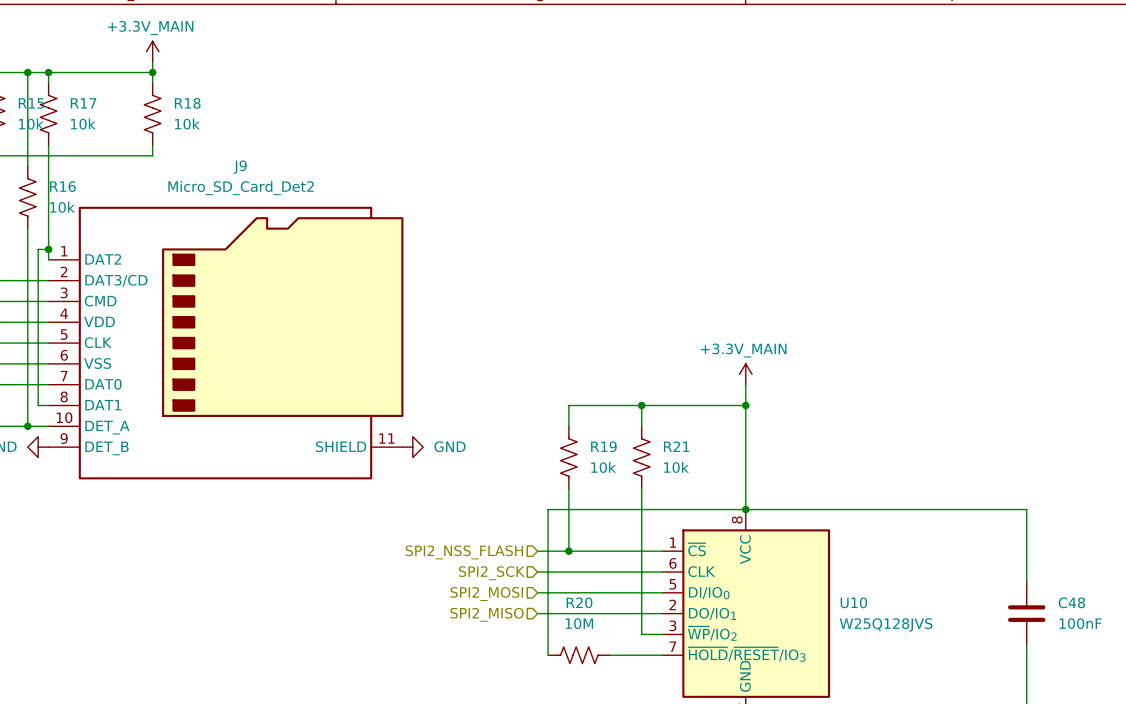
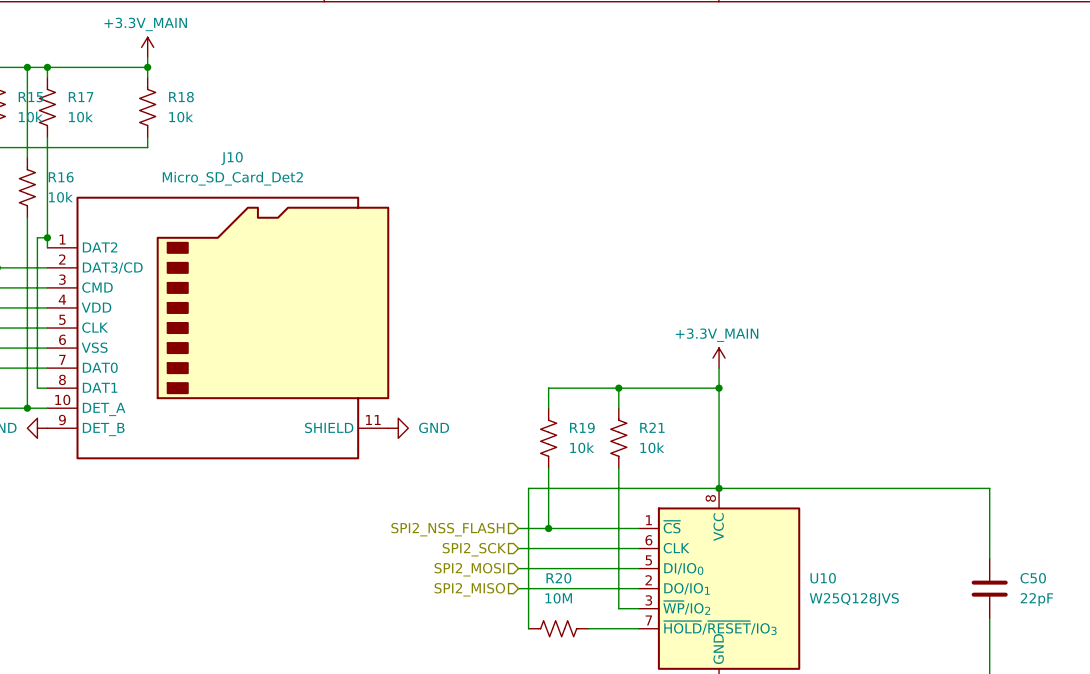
J9 name: J9 (240, 167) -> J10 (232, 158)
C48 name: C48 (1071, 602) -> C50 (1033, 578)
C48 value: 100nF (1080, 623) -> 22pF (1036, 599)

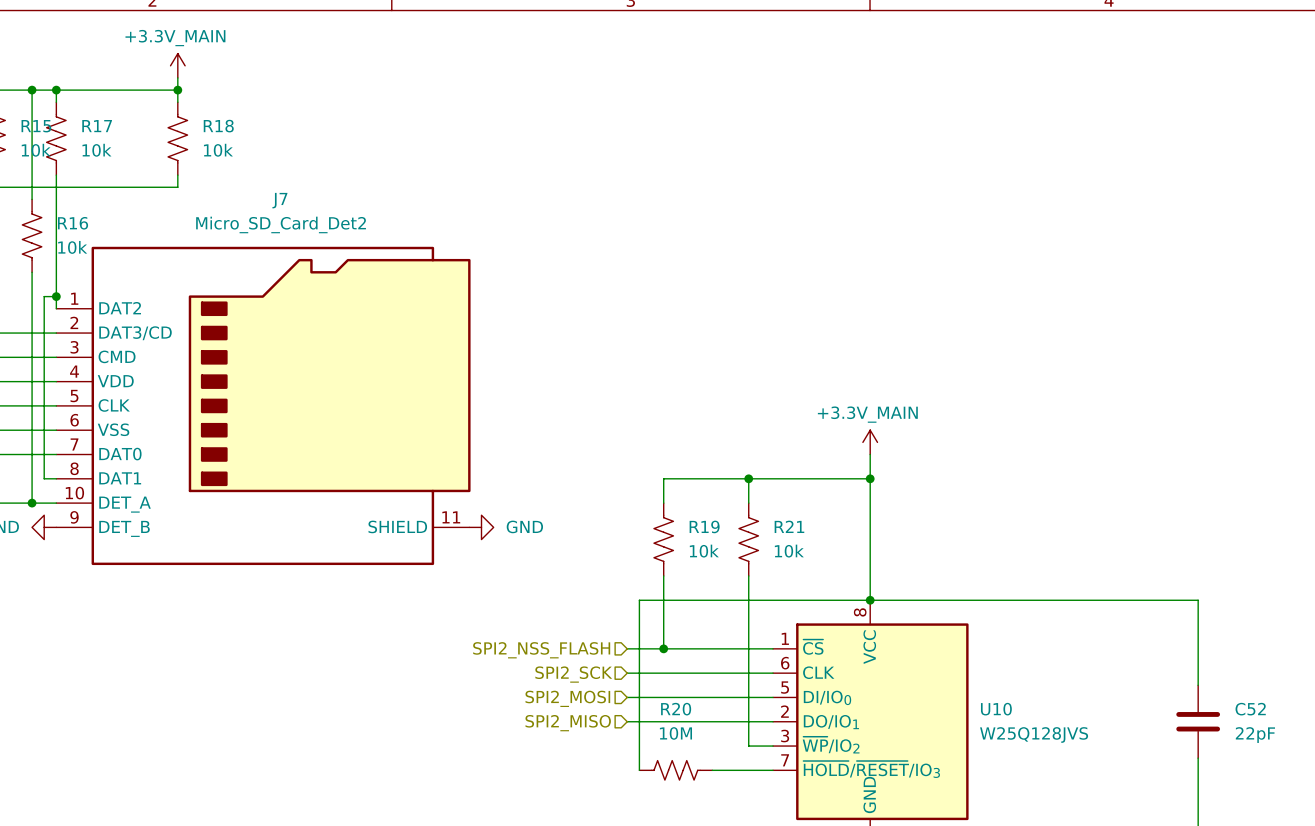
J10 name: J10 (232, 158) -> J7 (279, 200)
C50 name: C50 (1033, 578) -> C52 (1250, 709)

